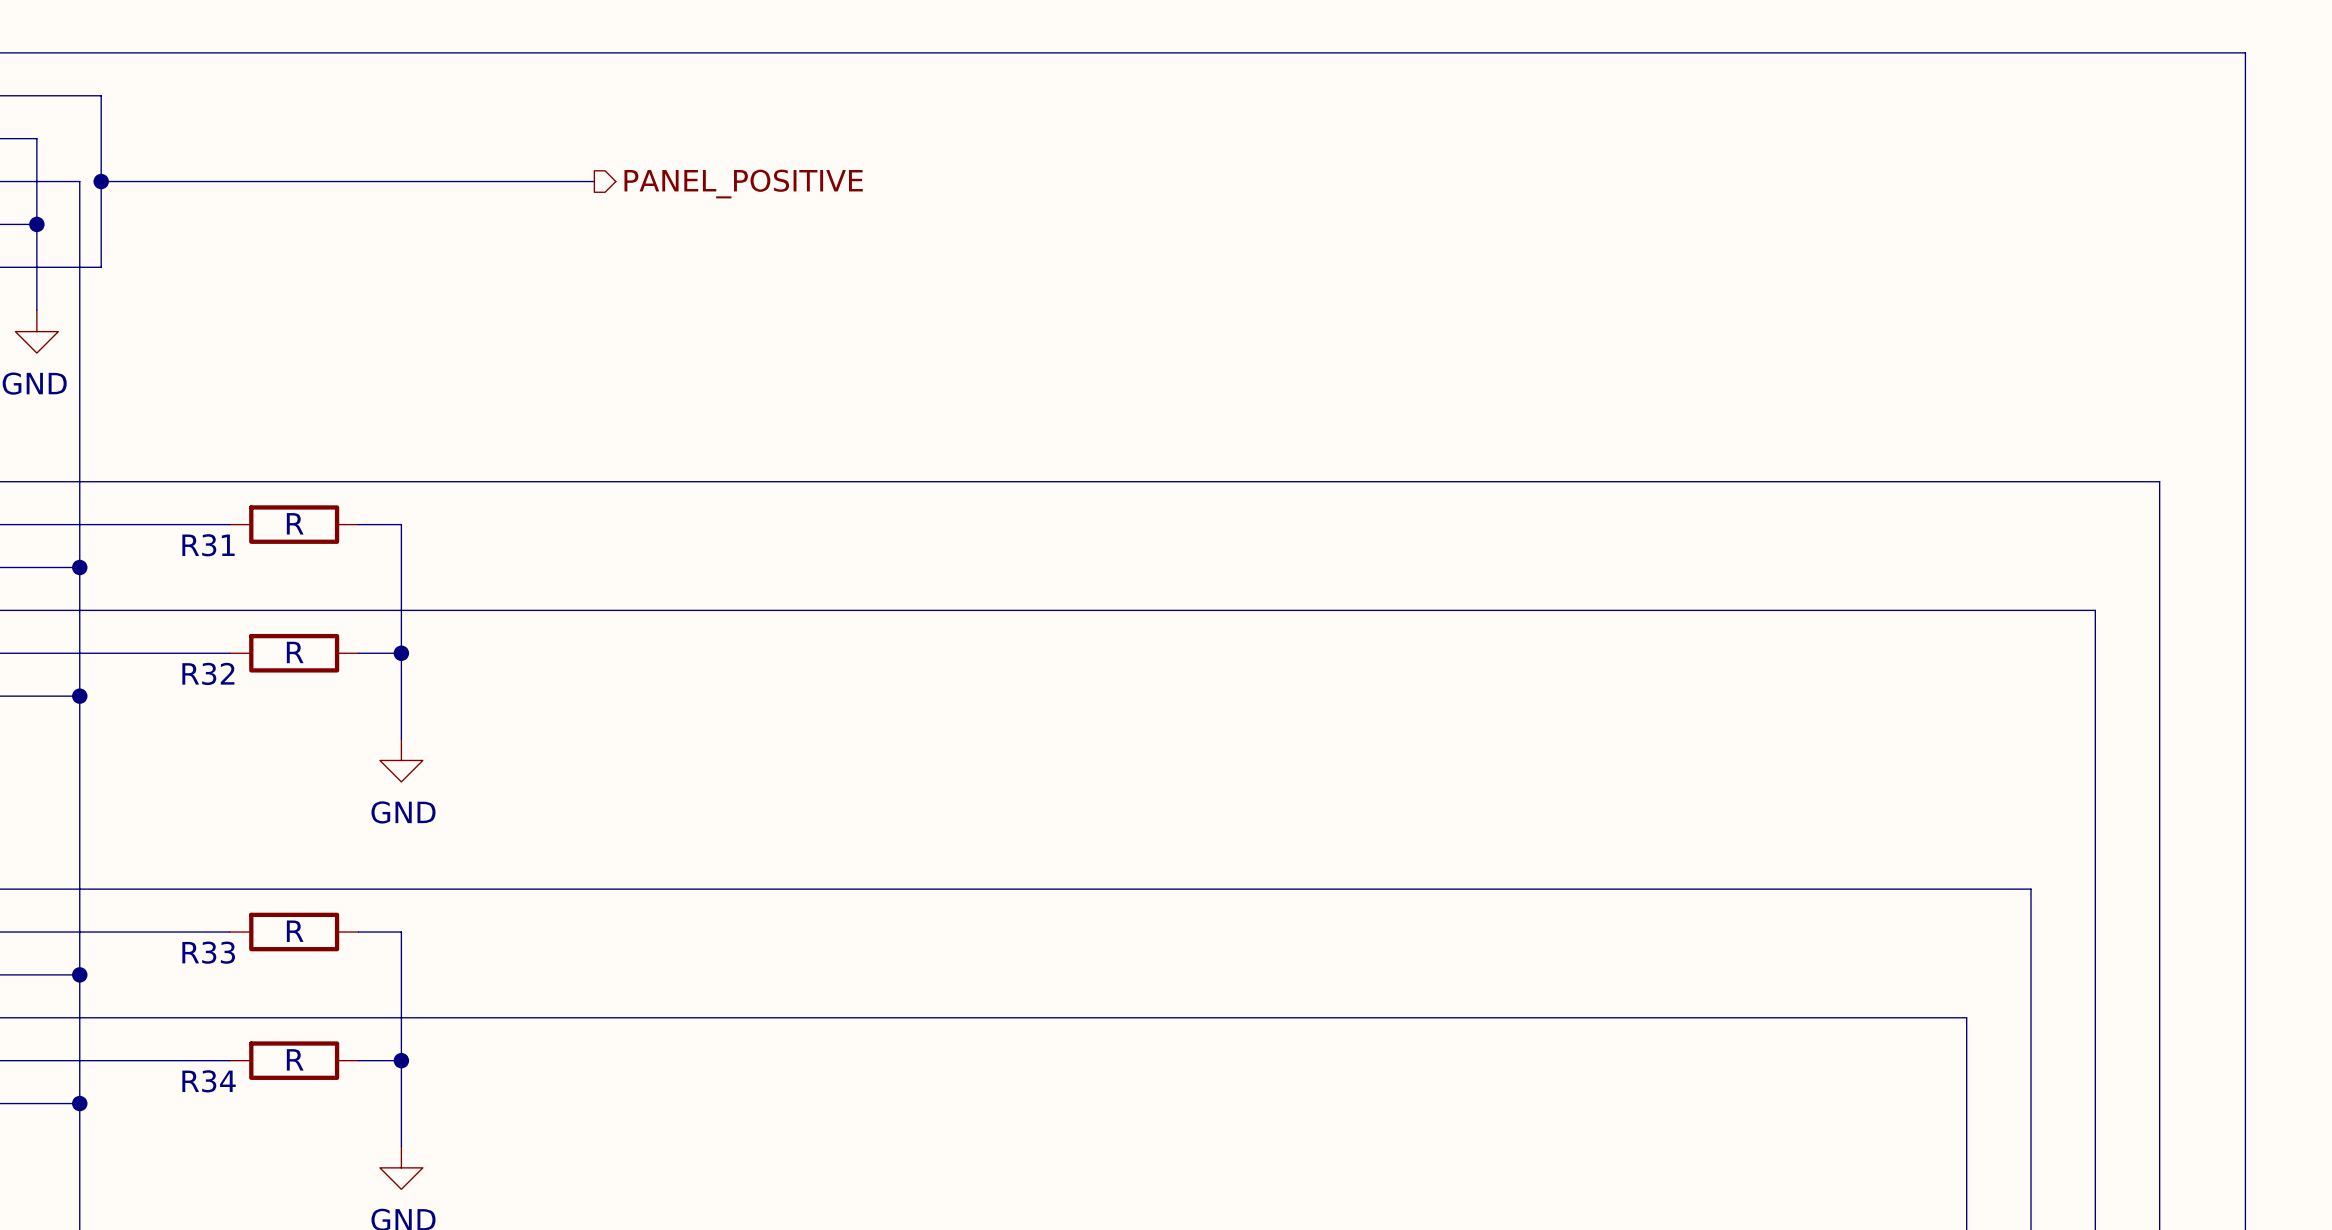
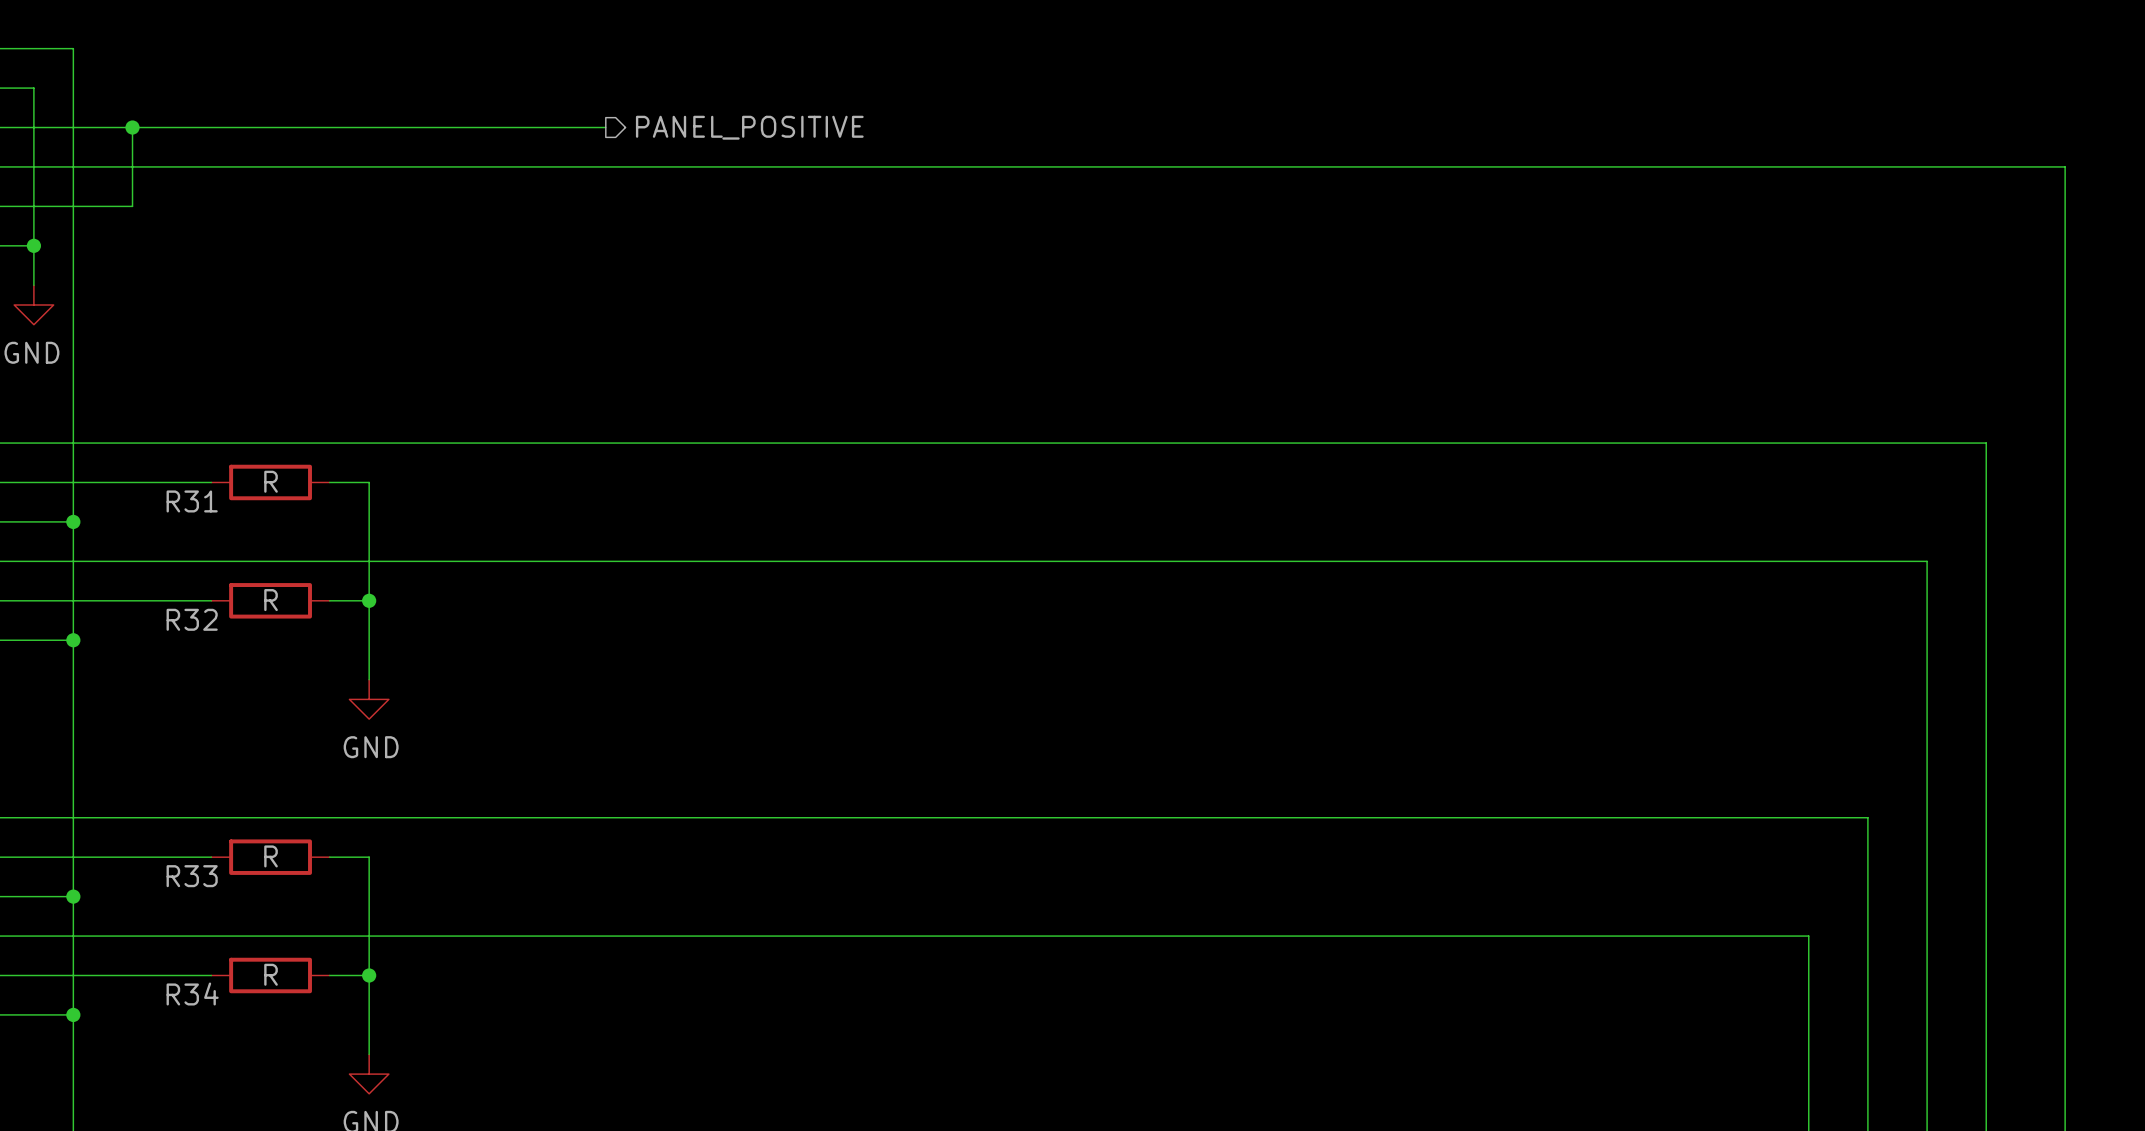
wire: (79, 52) (2245, 52) (2245, 181) -> (546, 166) (2065, 166)
wire: none -> (73, 48) (73, 166) (93, 166)
wire: (36, 95) (101, 95) (101, 267) (36, 267) -> (33, 88) (33, 127) (605, 127)
wire: none -> (132, 127) (132, 206) (33, 206)
junction: none -> (132, 127)
junction: (101, 181) -> none
hierarchical label position: PANEL_POSITIVE (743, 184) -> PANEL_POSITIVE (749, 127)
junction position: (36, 224) -> (33, 245)

